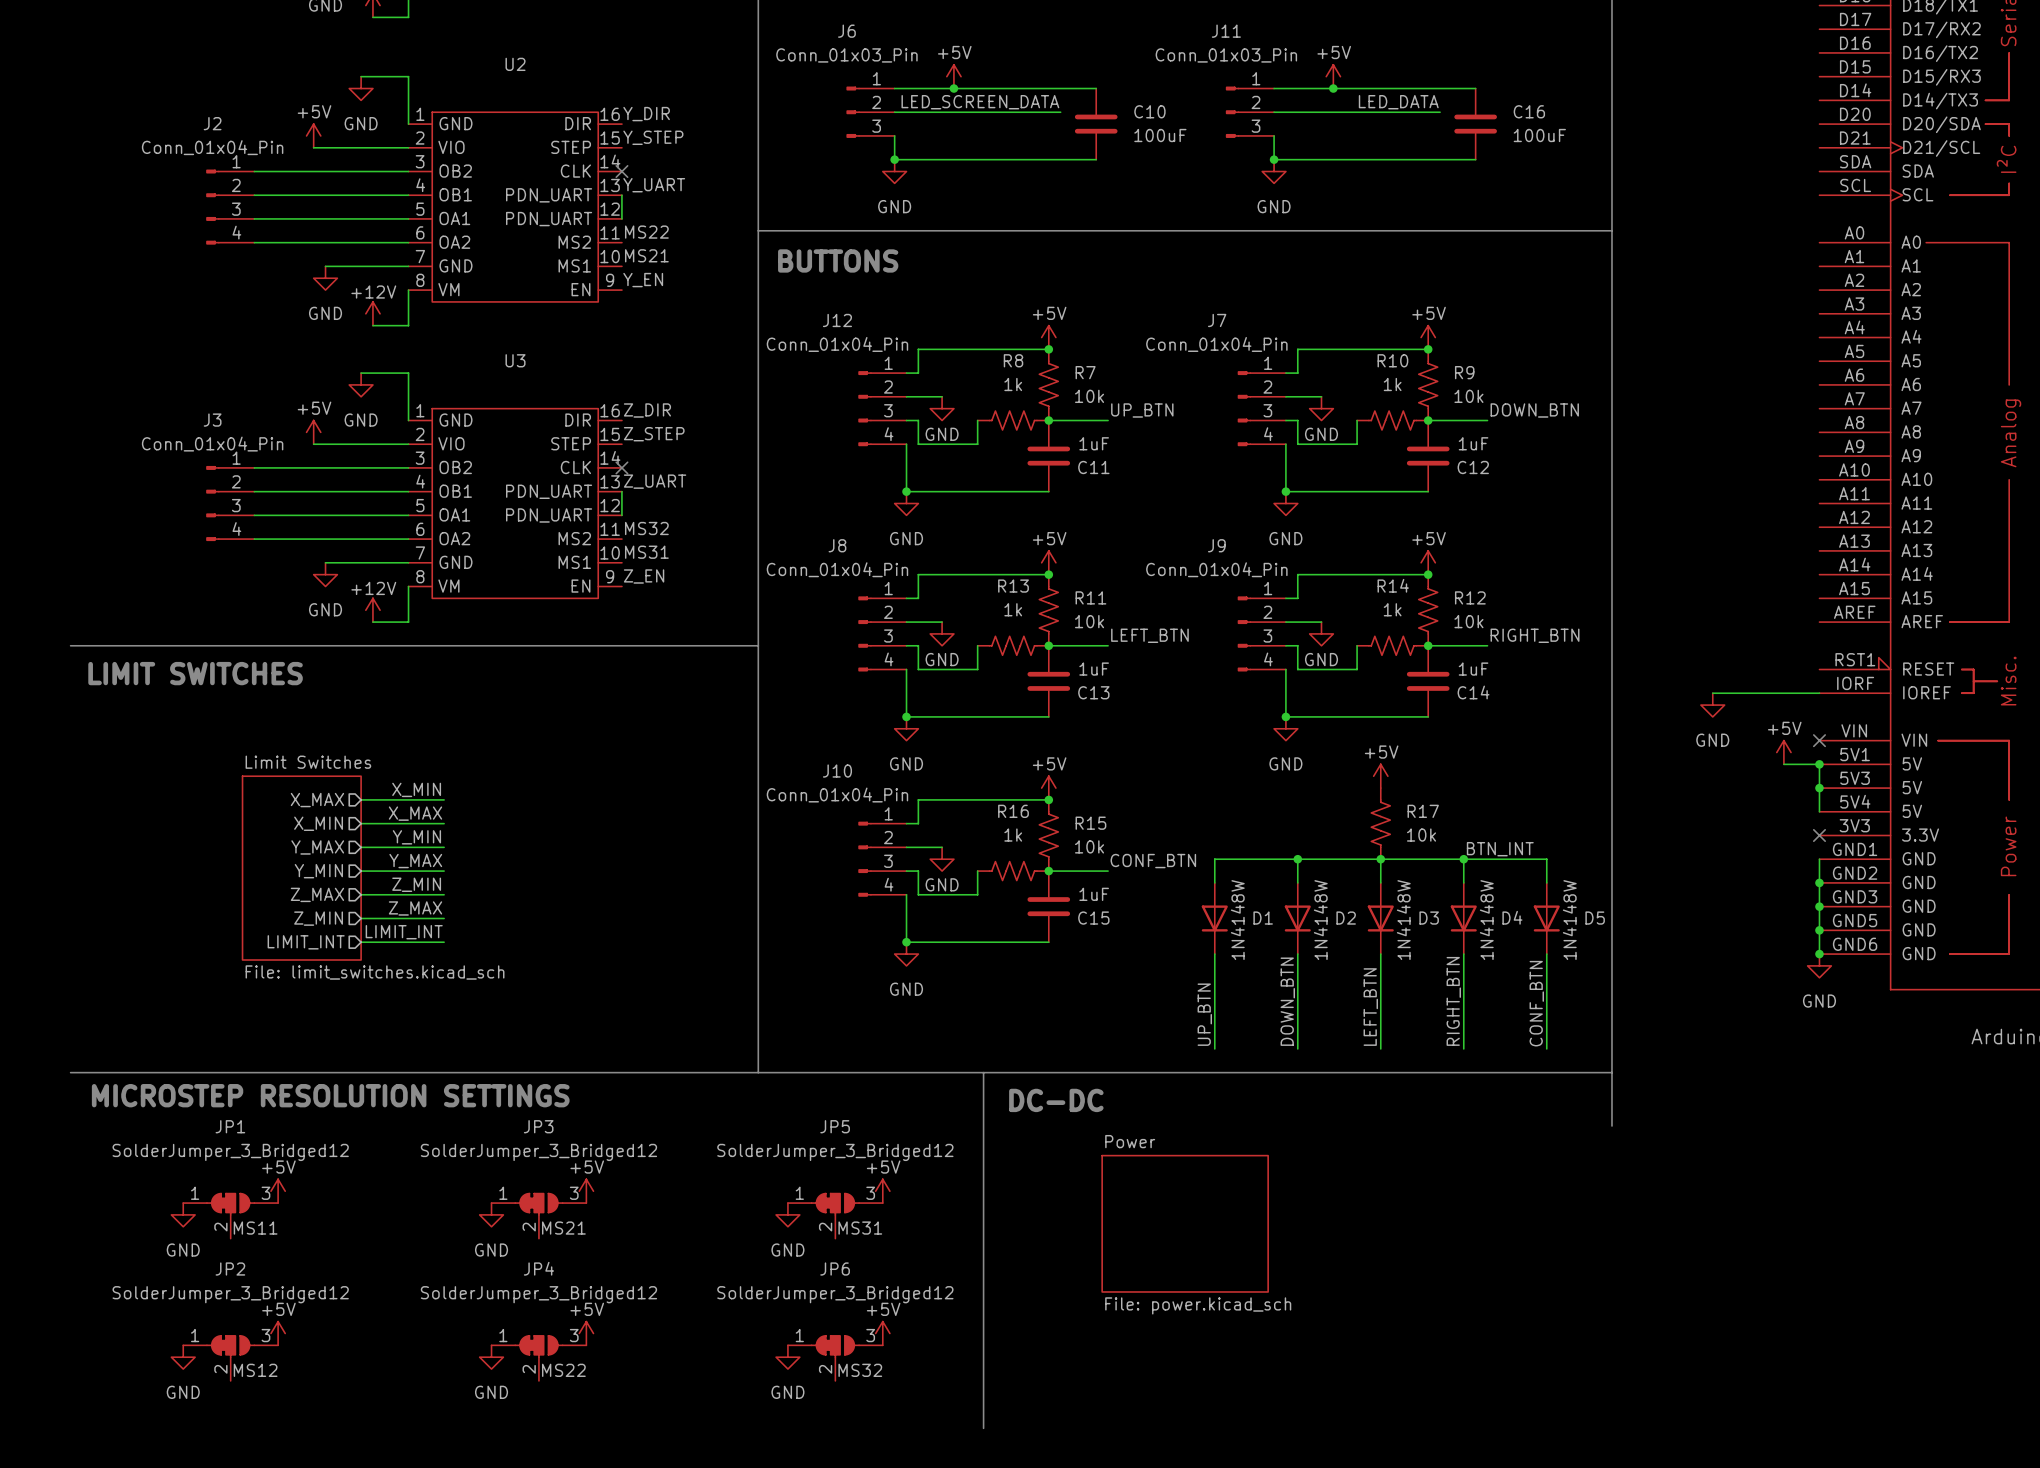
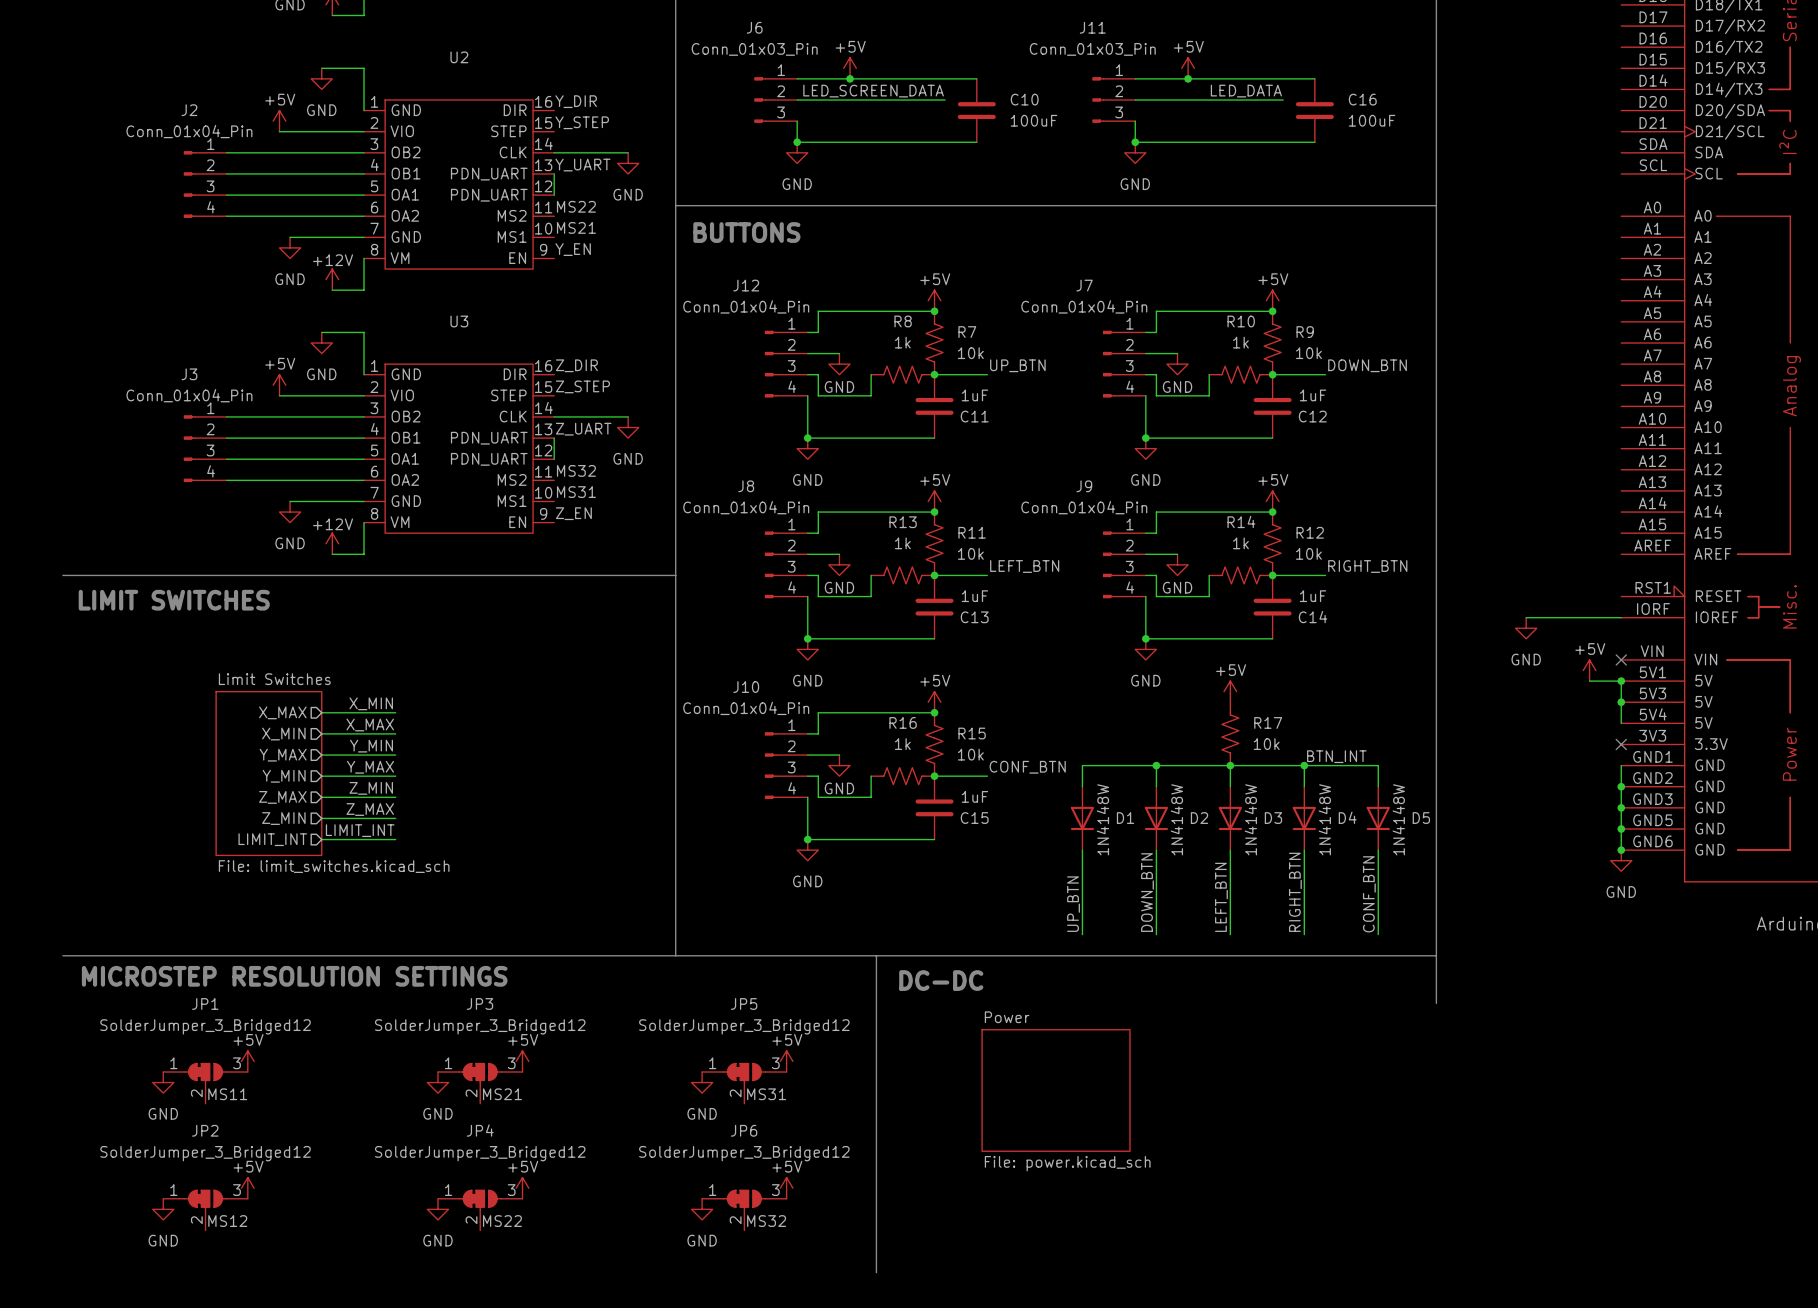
wire: none -> (554, 152) (628, 152)
no-connect mark: (621, 171) -> none
power symbol: none -> GND (628, 163)
wire: none -> (554, 416) (628, 416)
no-connect mark: (621, 467) -> none
power symbol: none -> GND (628, 427)

